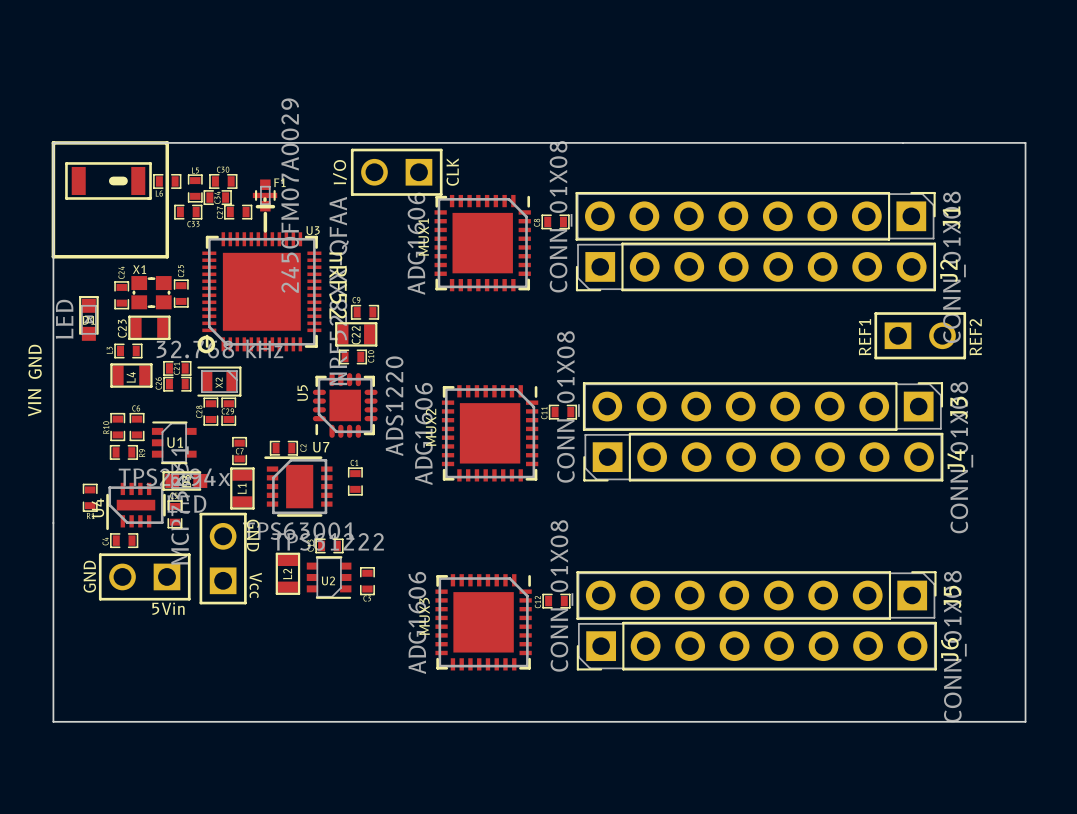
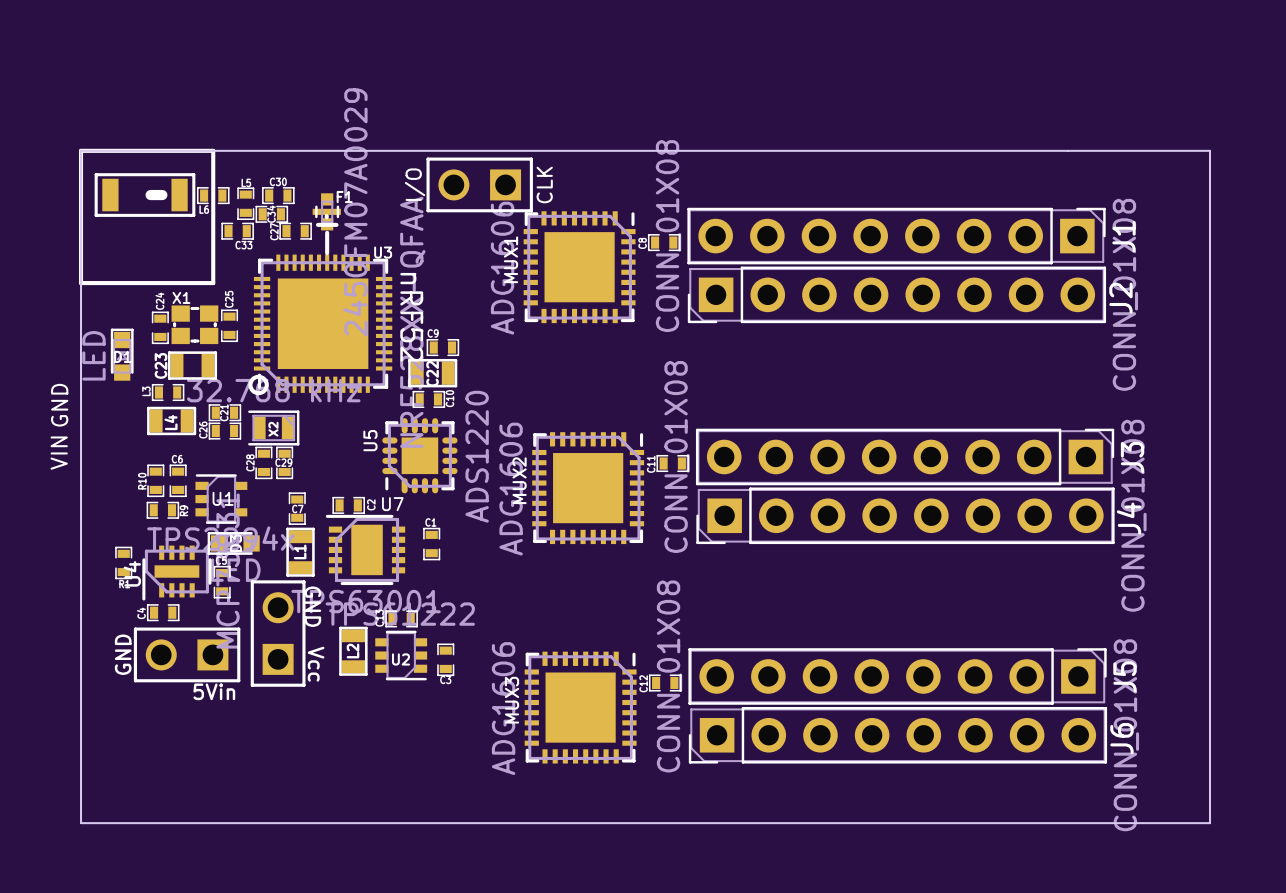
part: (920, 335) -> none
text: REF1 (864, 337) -> none
text: REF2 (975, 337) -> none

